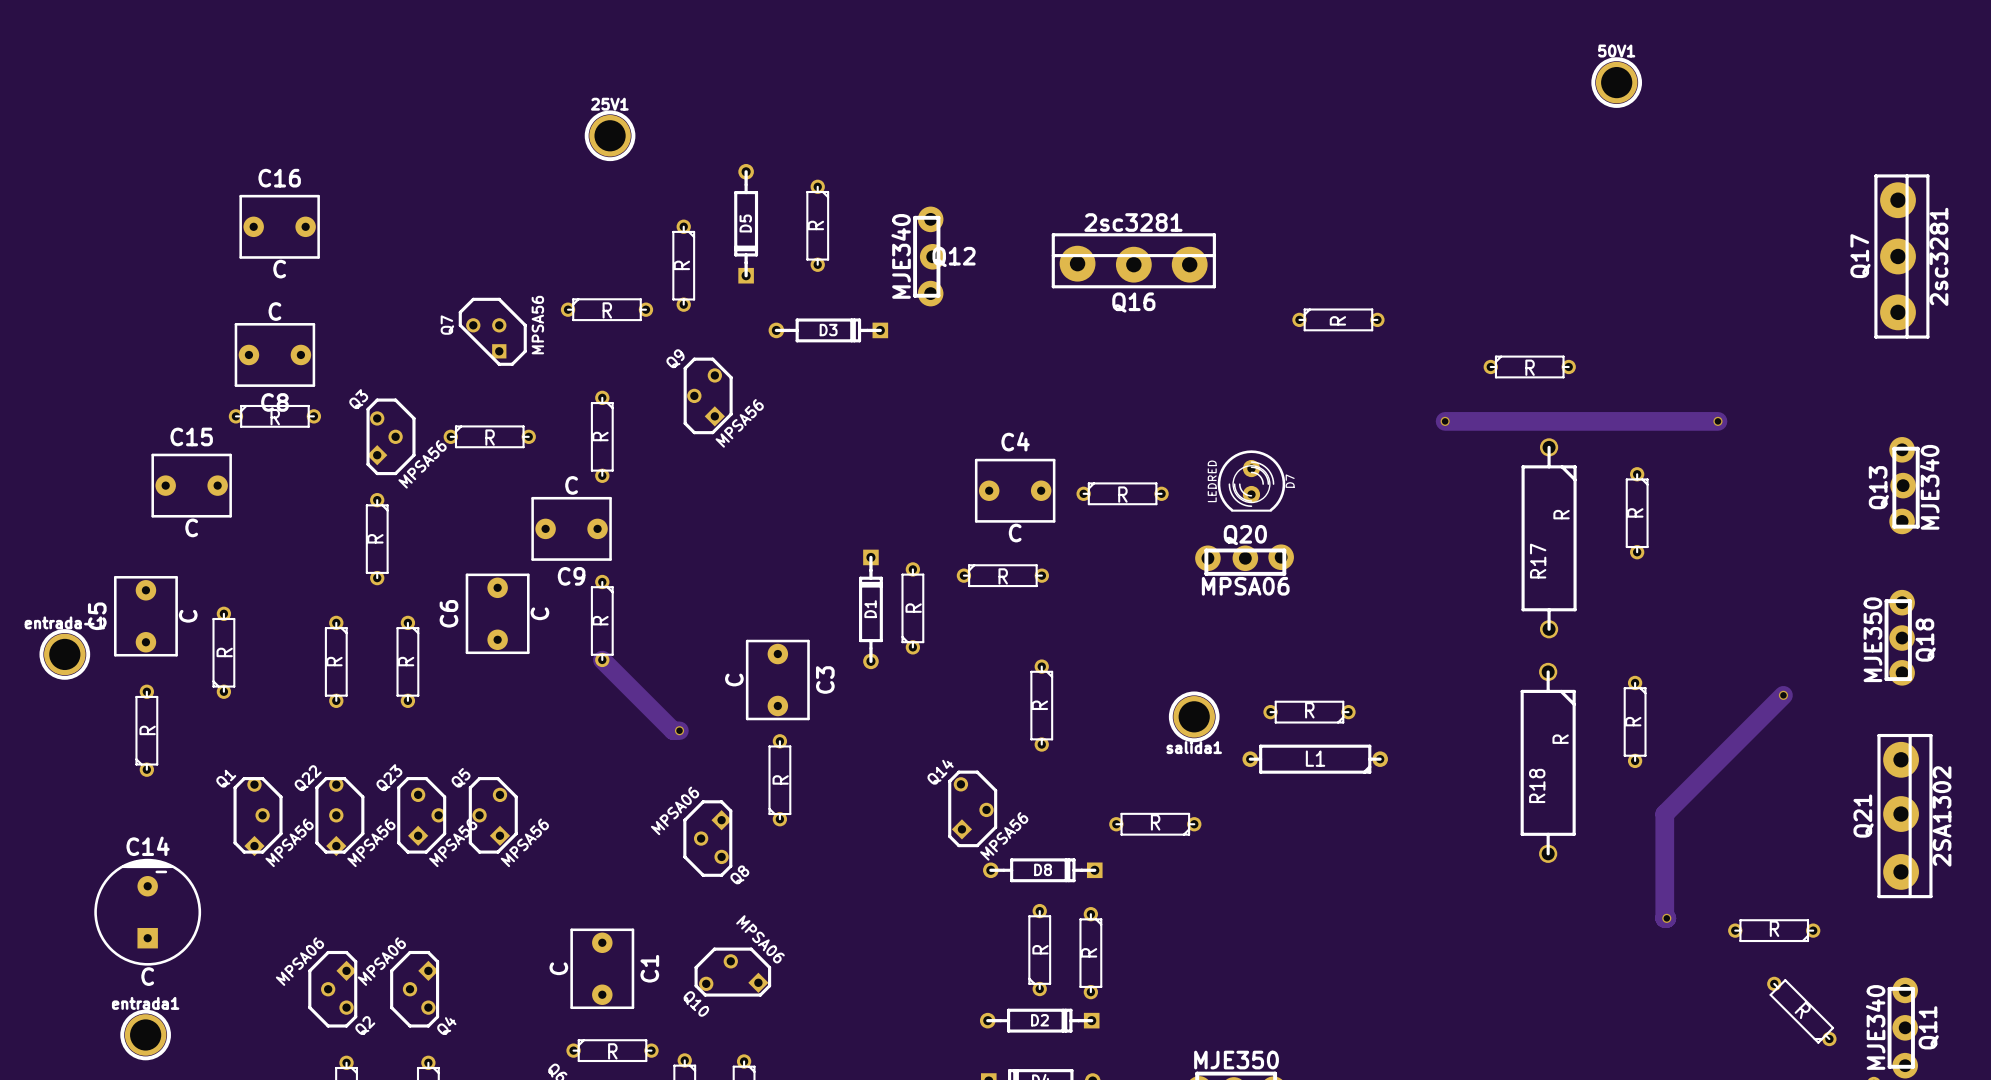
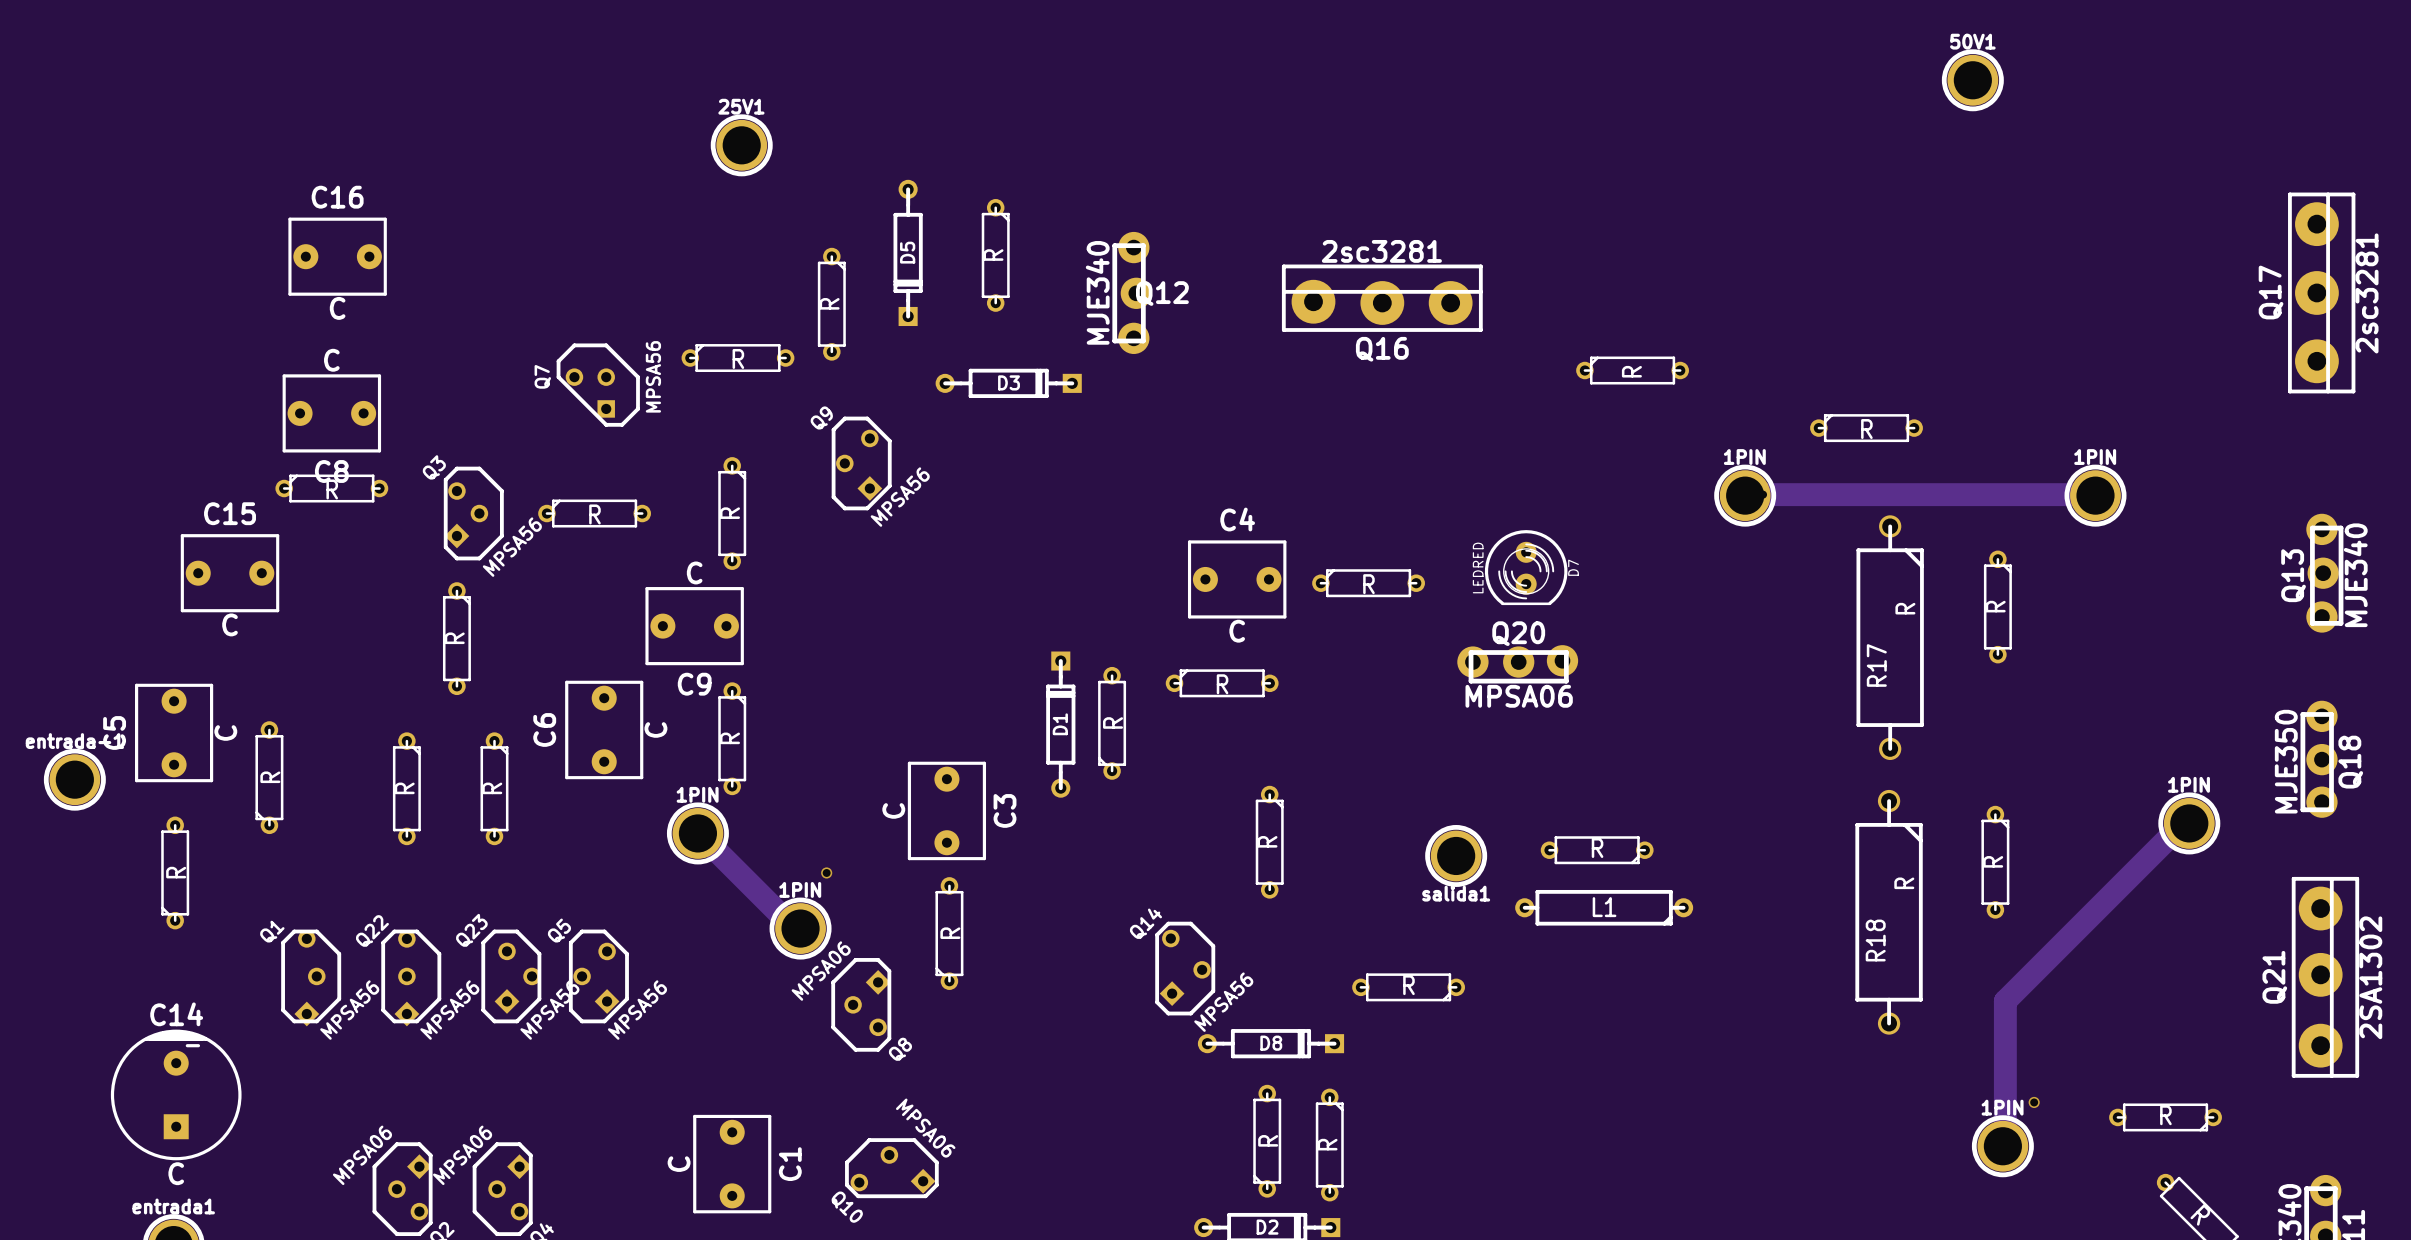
1PIN: none -> (1745, 495)
1PIN: none -> (2095, 495)
track: (602, 659) (673, 730) (679, 730) -> none
1PIN: none -> (2189, 823)
1PIN: none -> (697, 833)
track: none -> (696, 834) (700, 834) (794, 928)
1PIN: none -> (800, 928)
track: (1664, 814) (1664, 918) (1666, 918) -> (2031, 974) (2005, 1001) (2005, 1152) (2006, 1151)
1PIN: none -> (2002, 1146)

